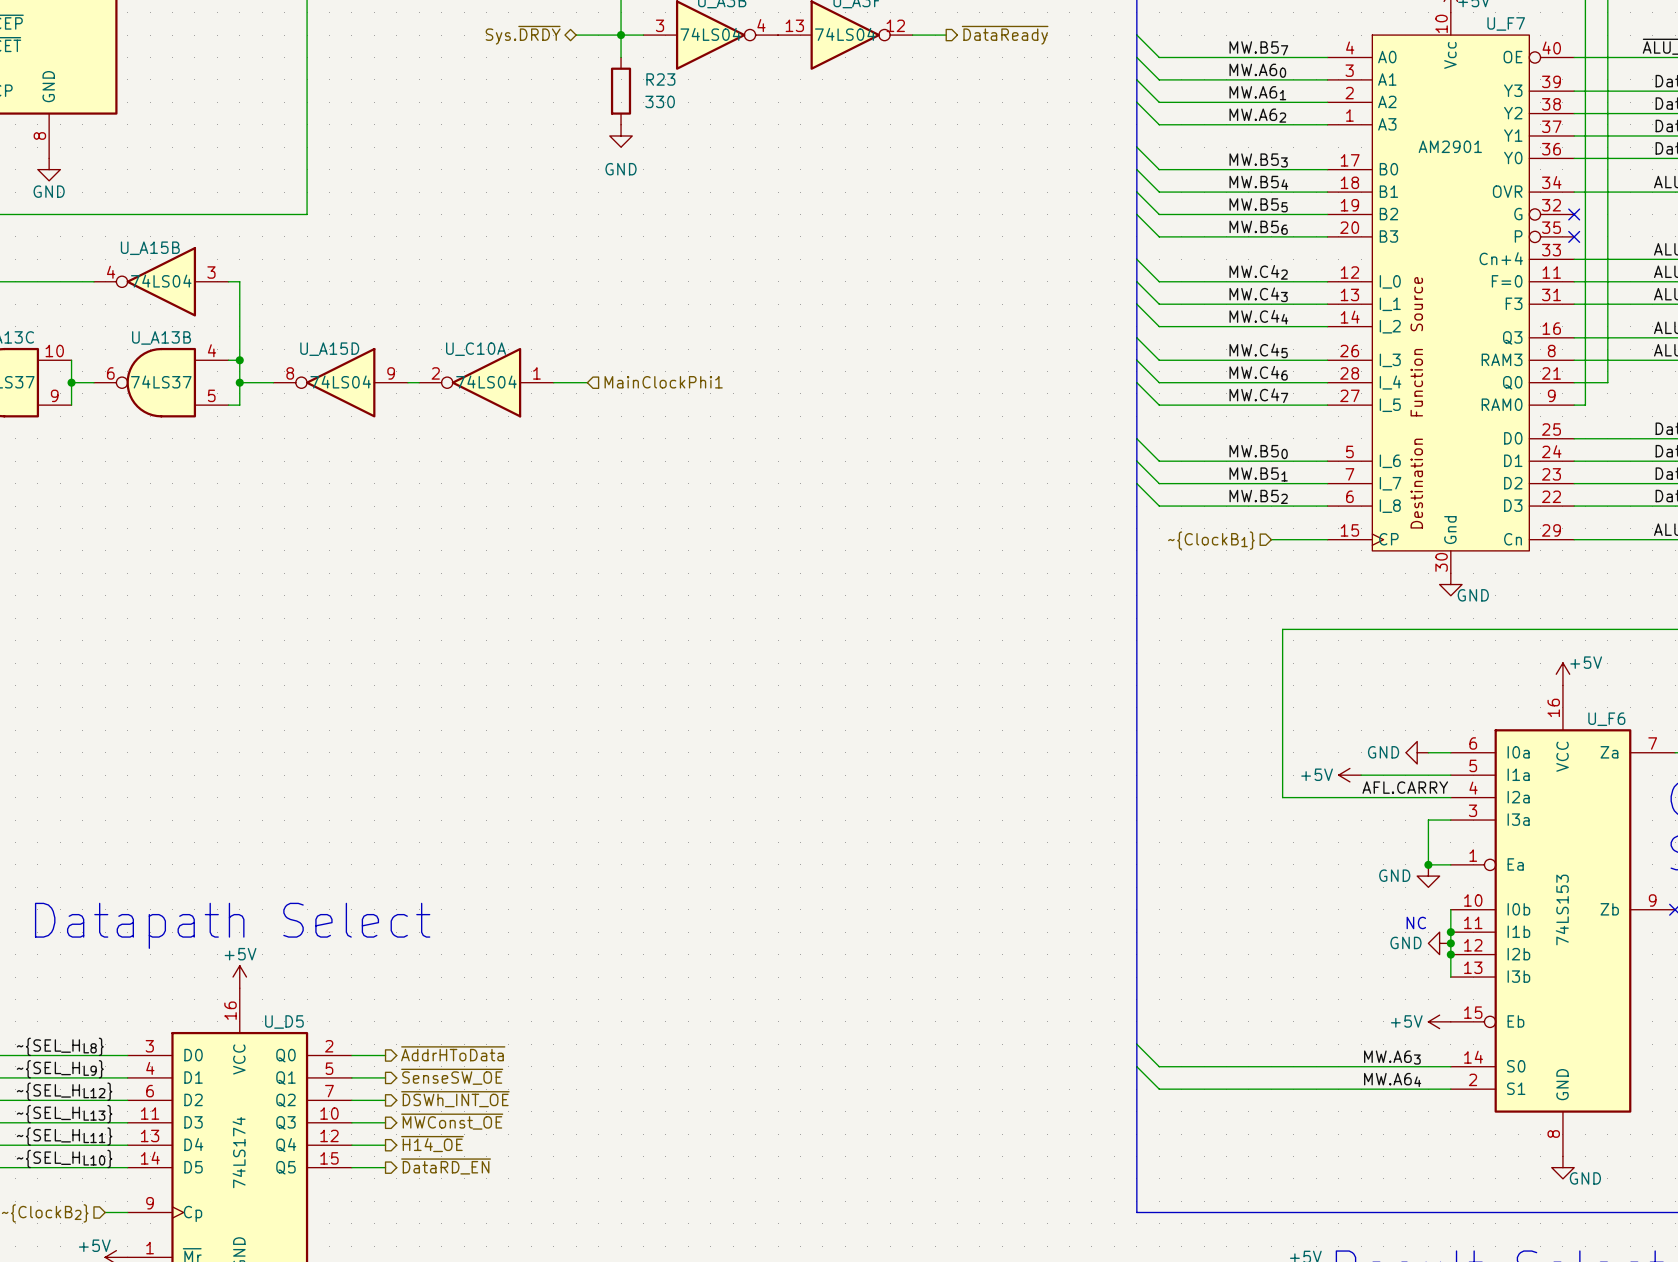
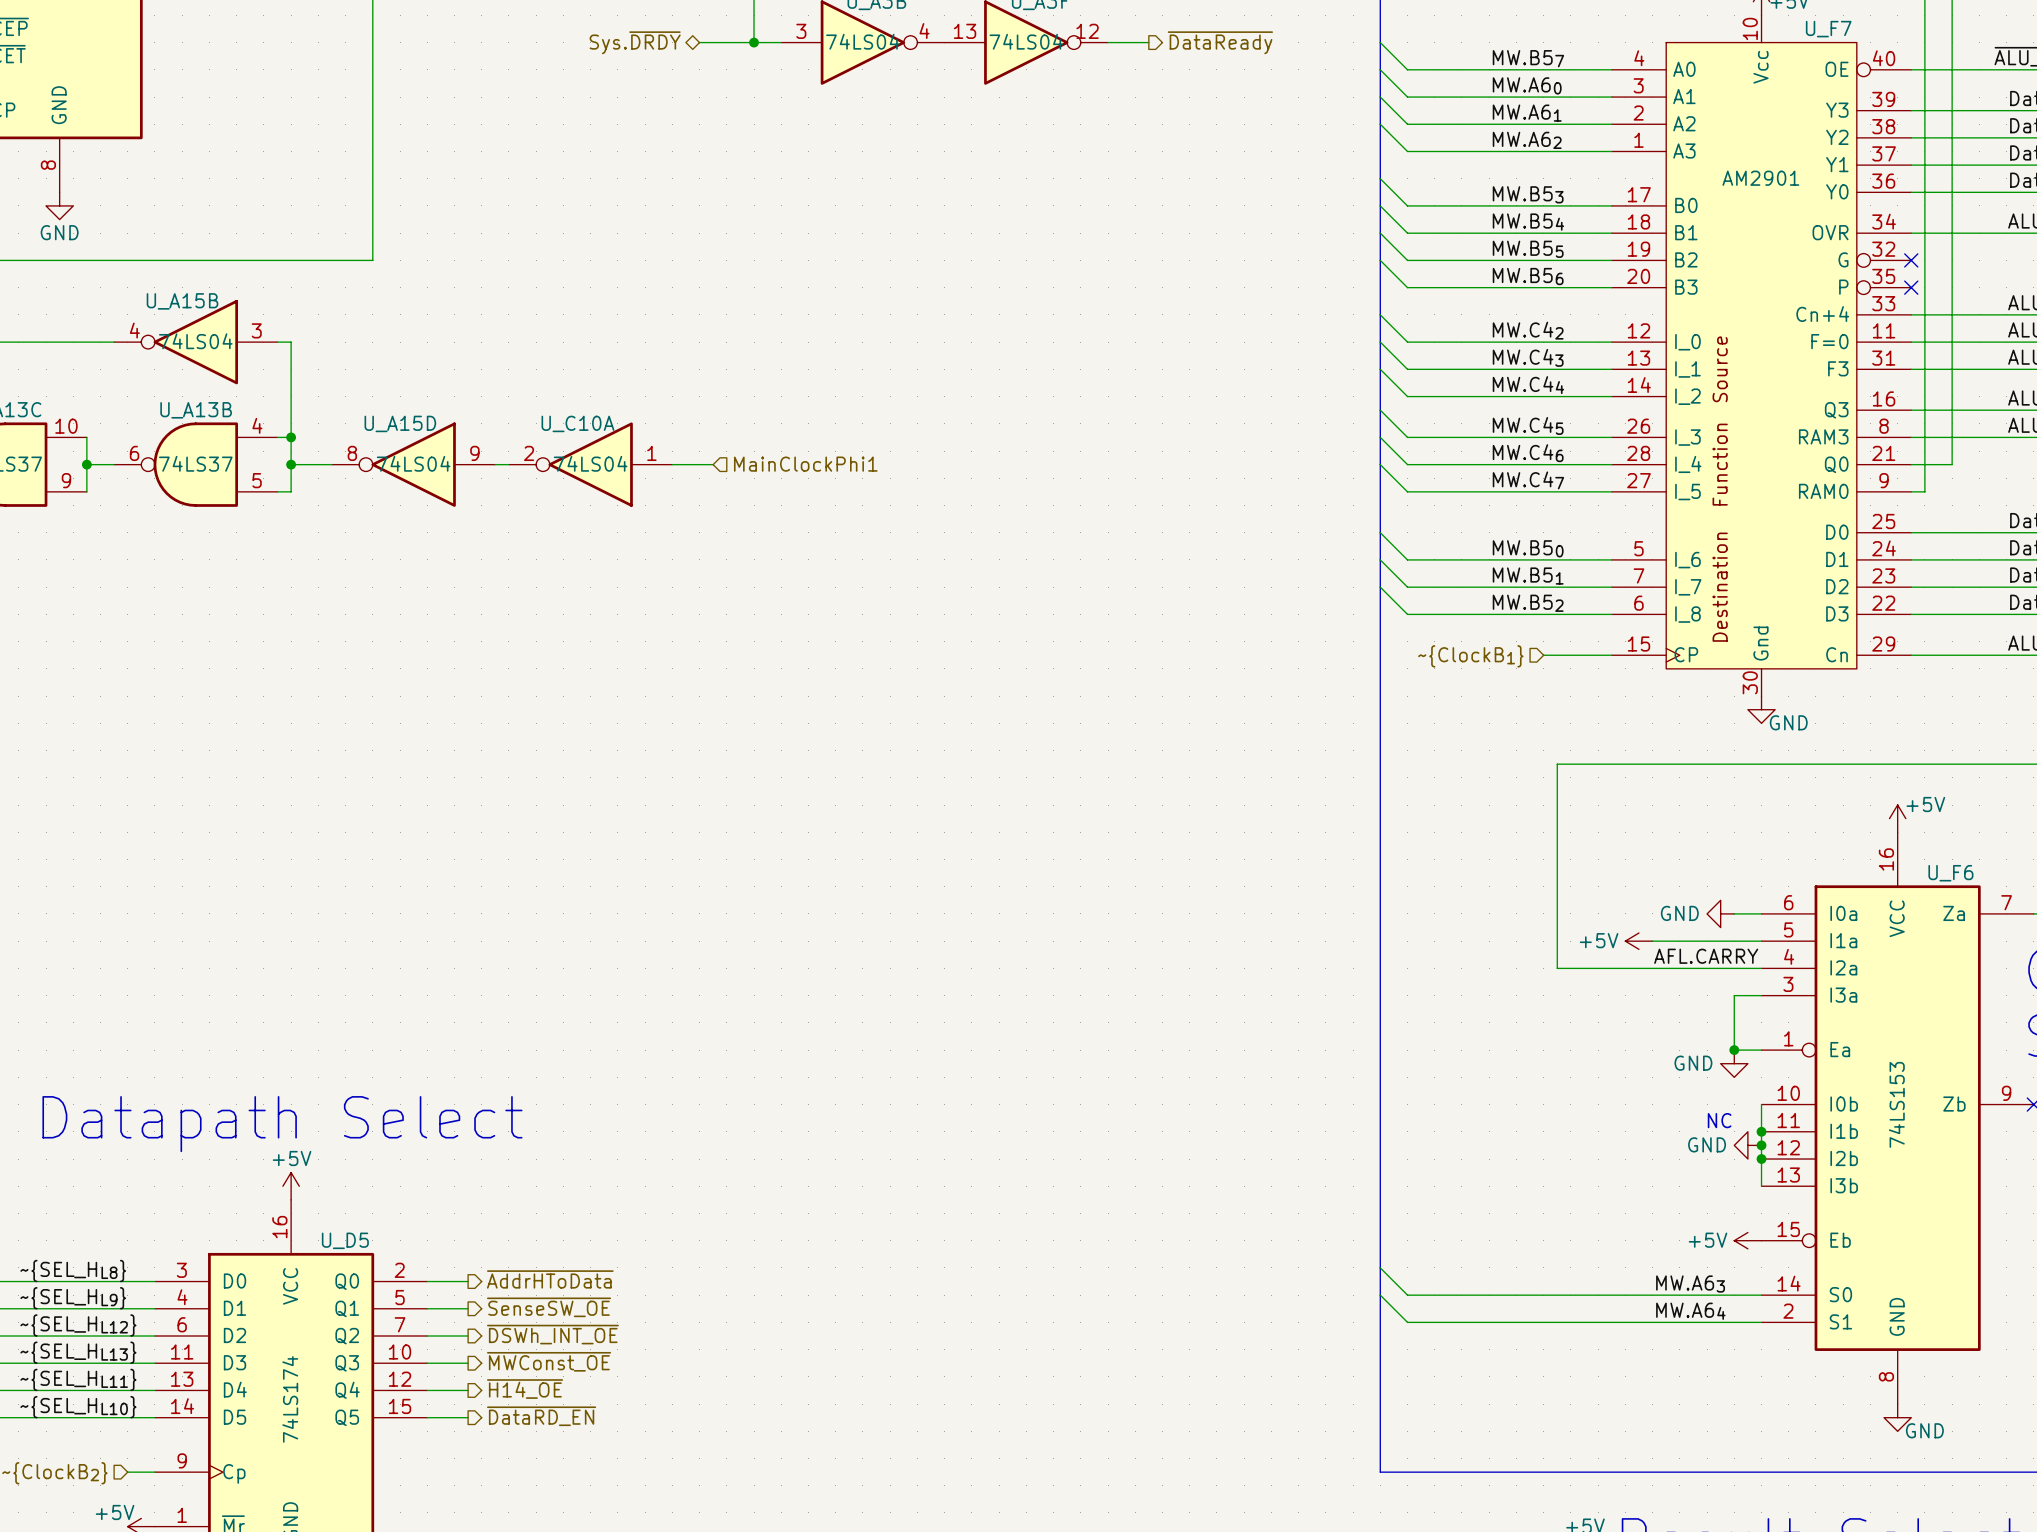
wire: (621, 35) (621, 57) -> none
R23: 330 (621, 91) -> none
power symbol: GND (621, 135) -> none

